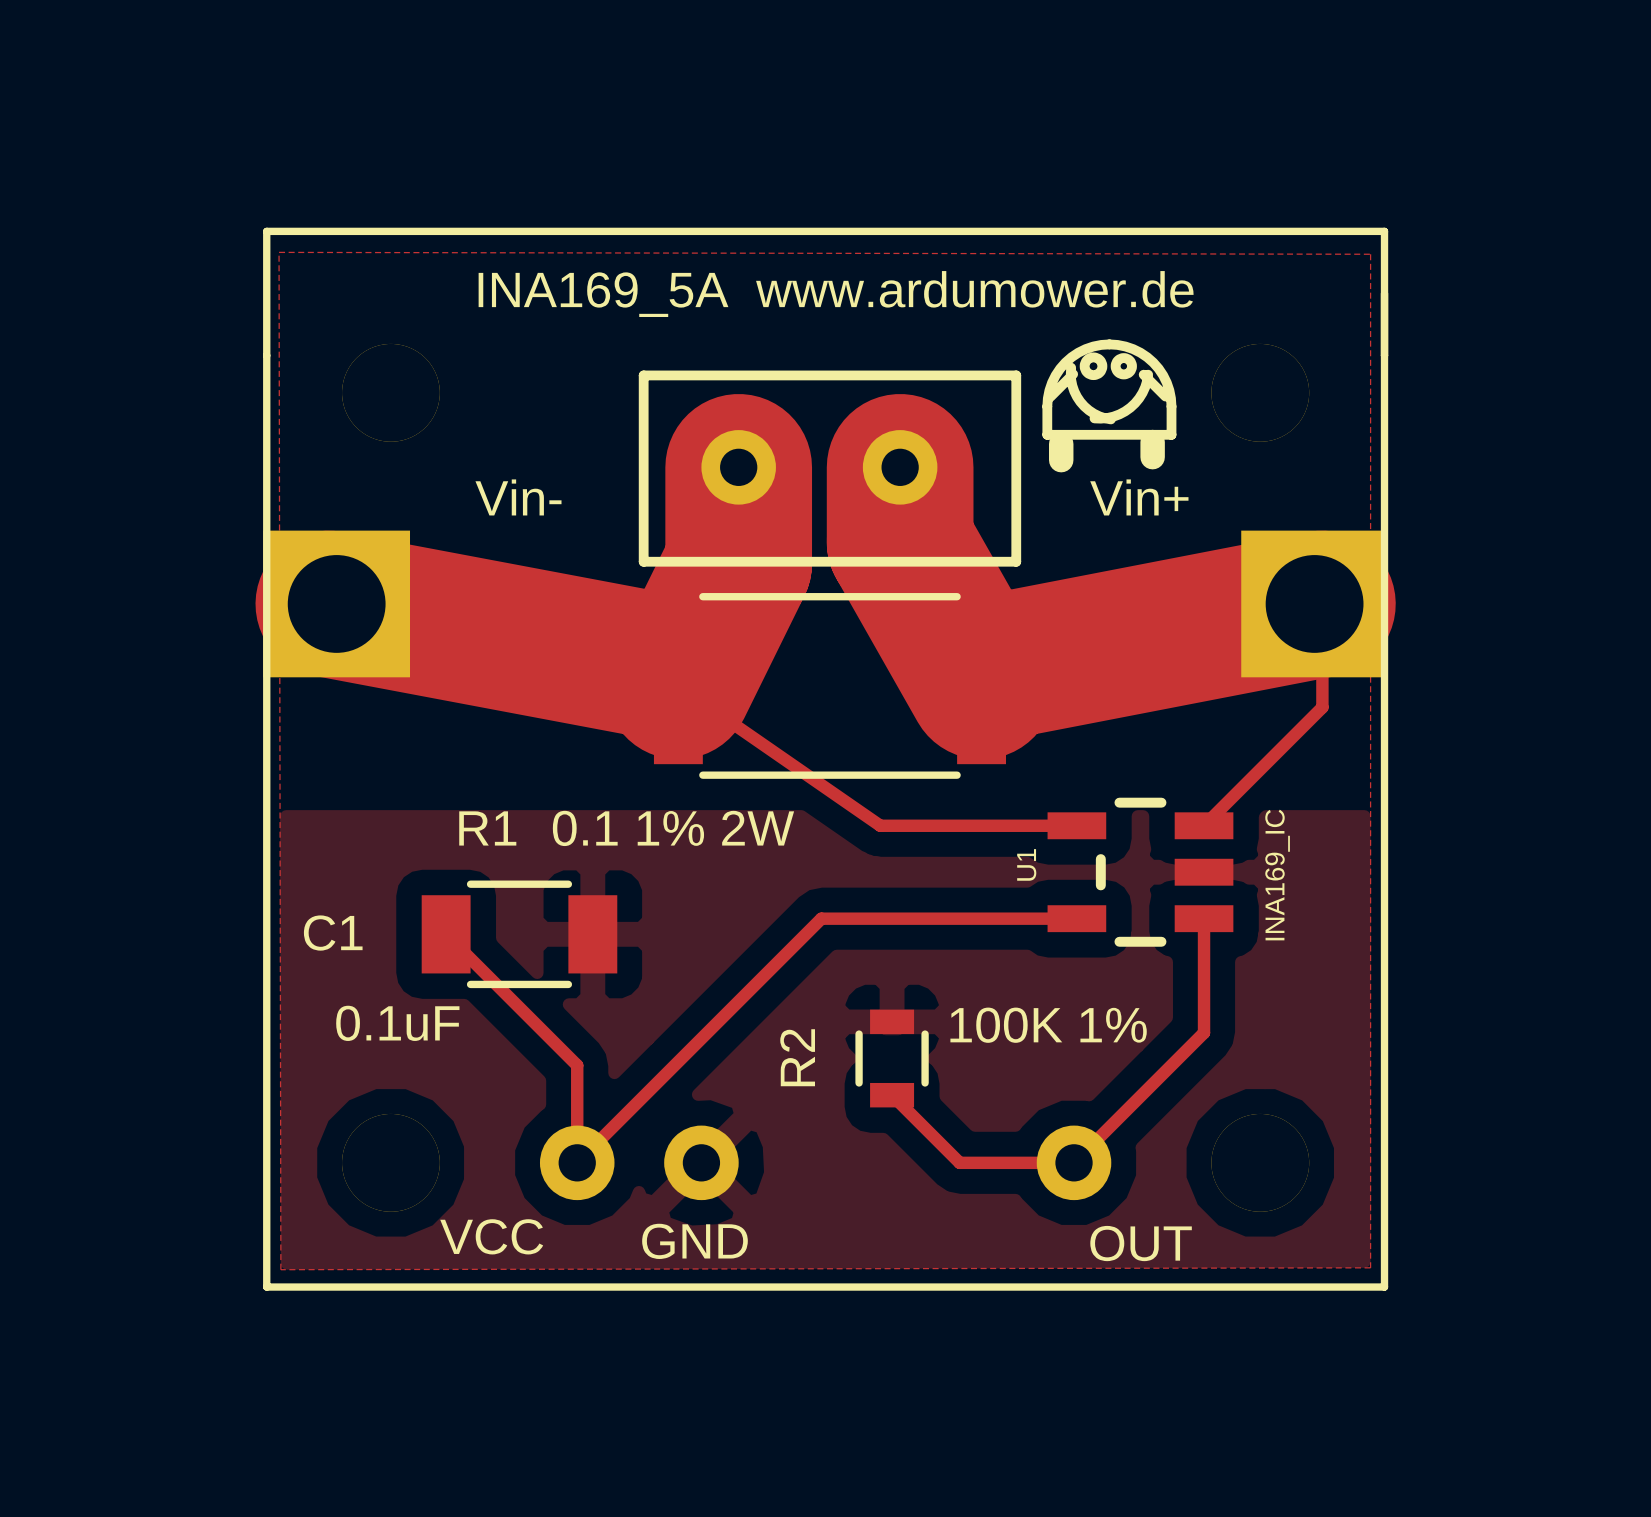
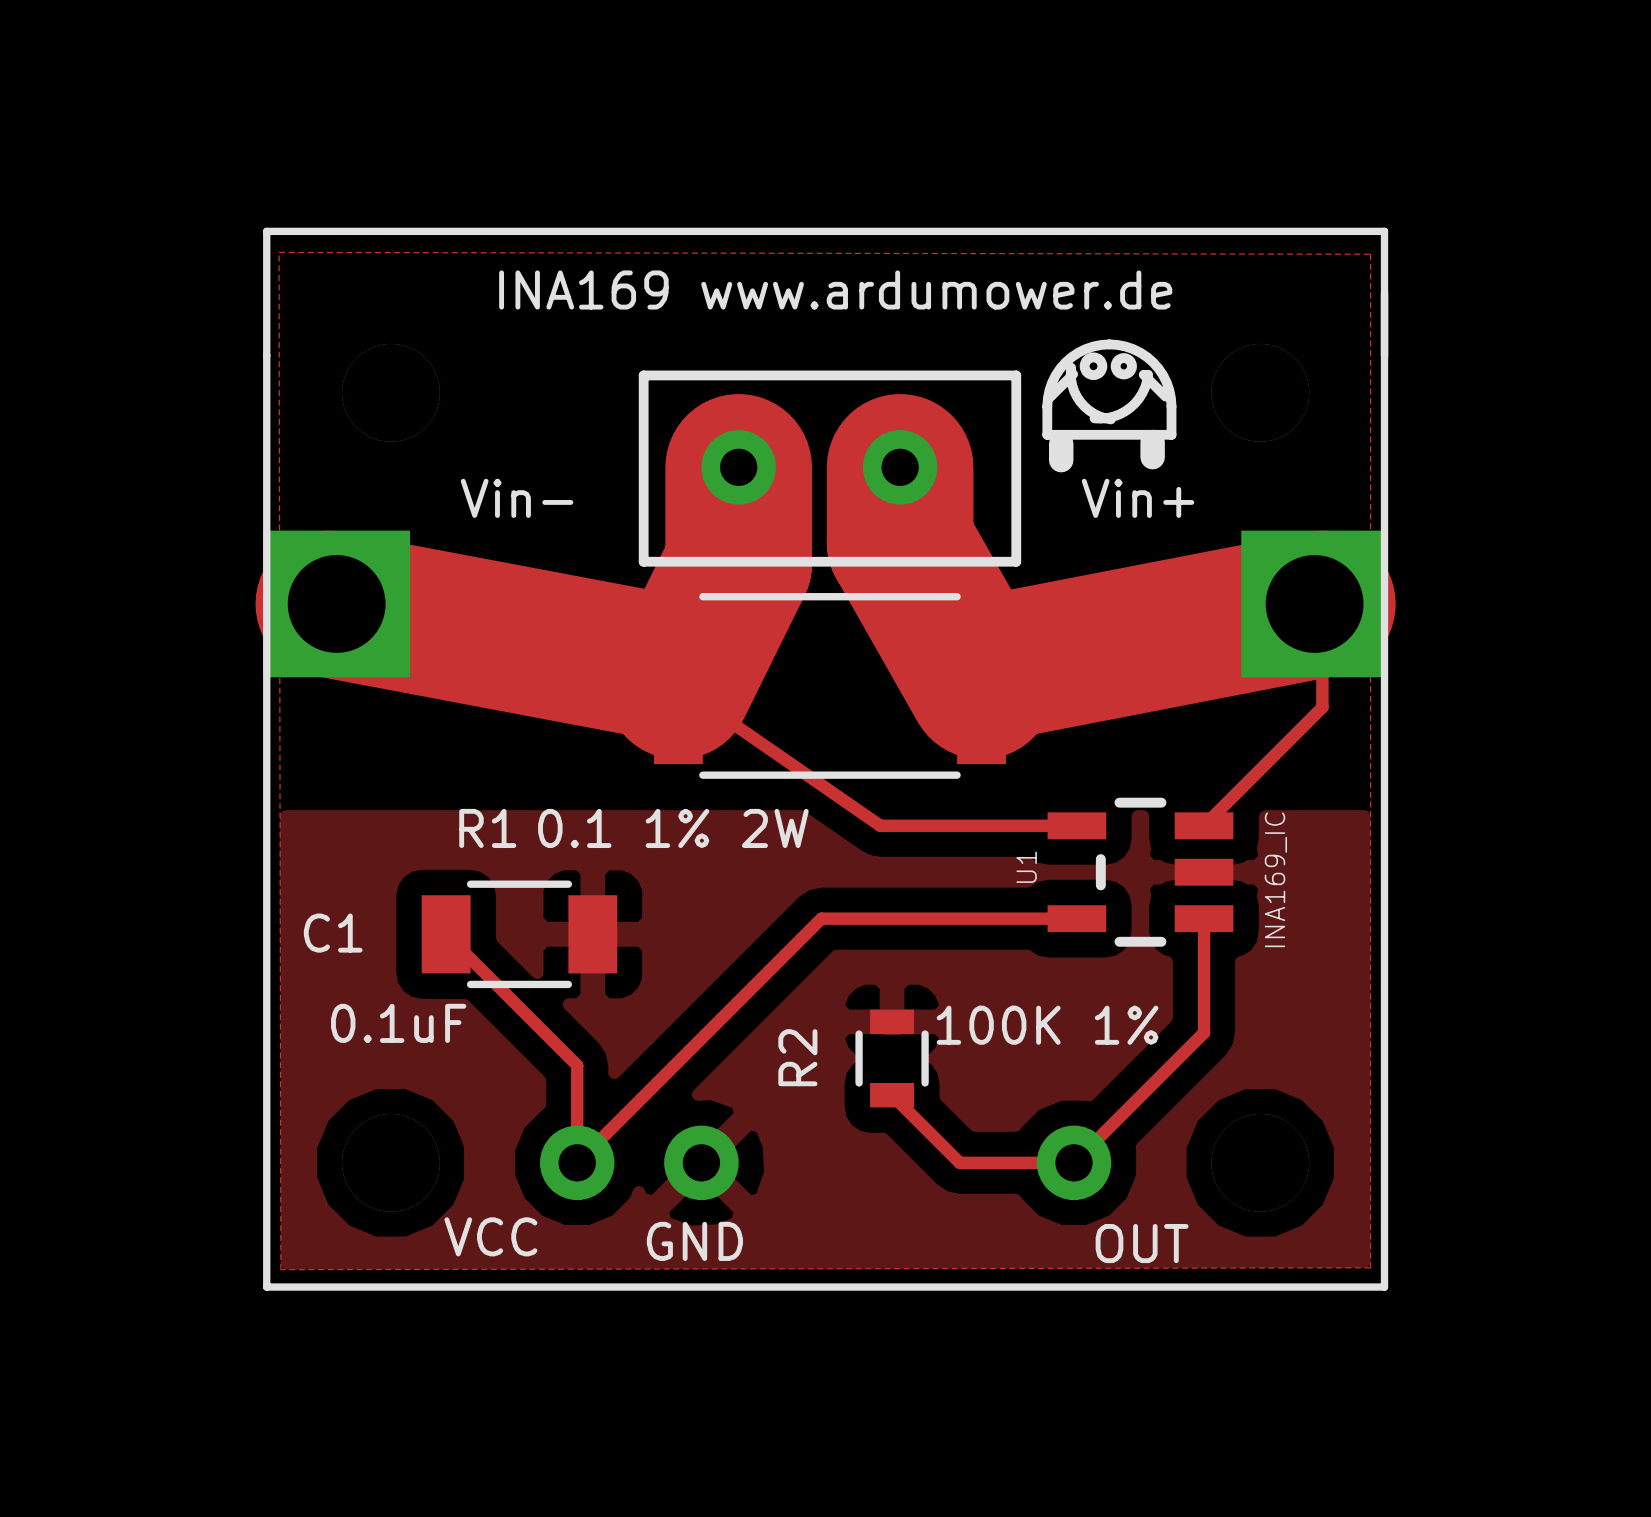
part value: INA169_5A www.ardumower.de (836, 294) -> INA169 www.ardumower.de (835, 289)

